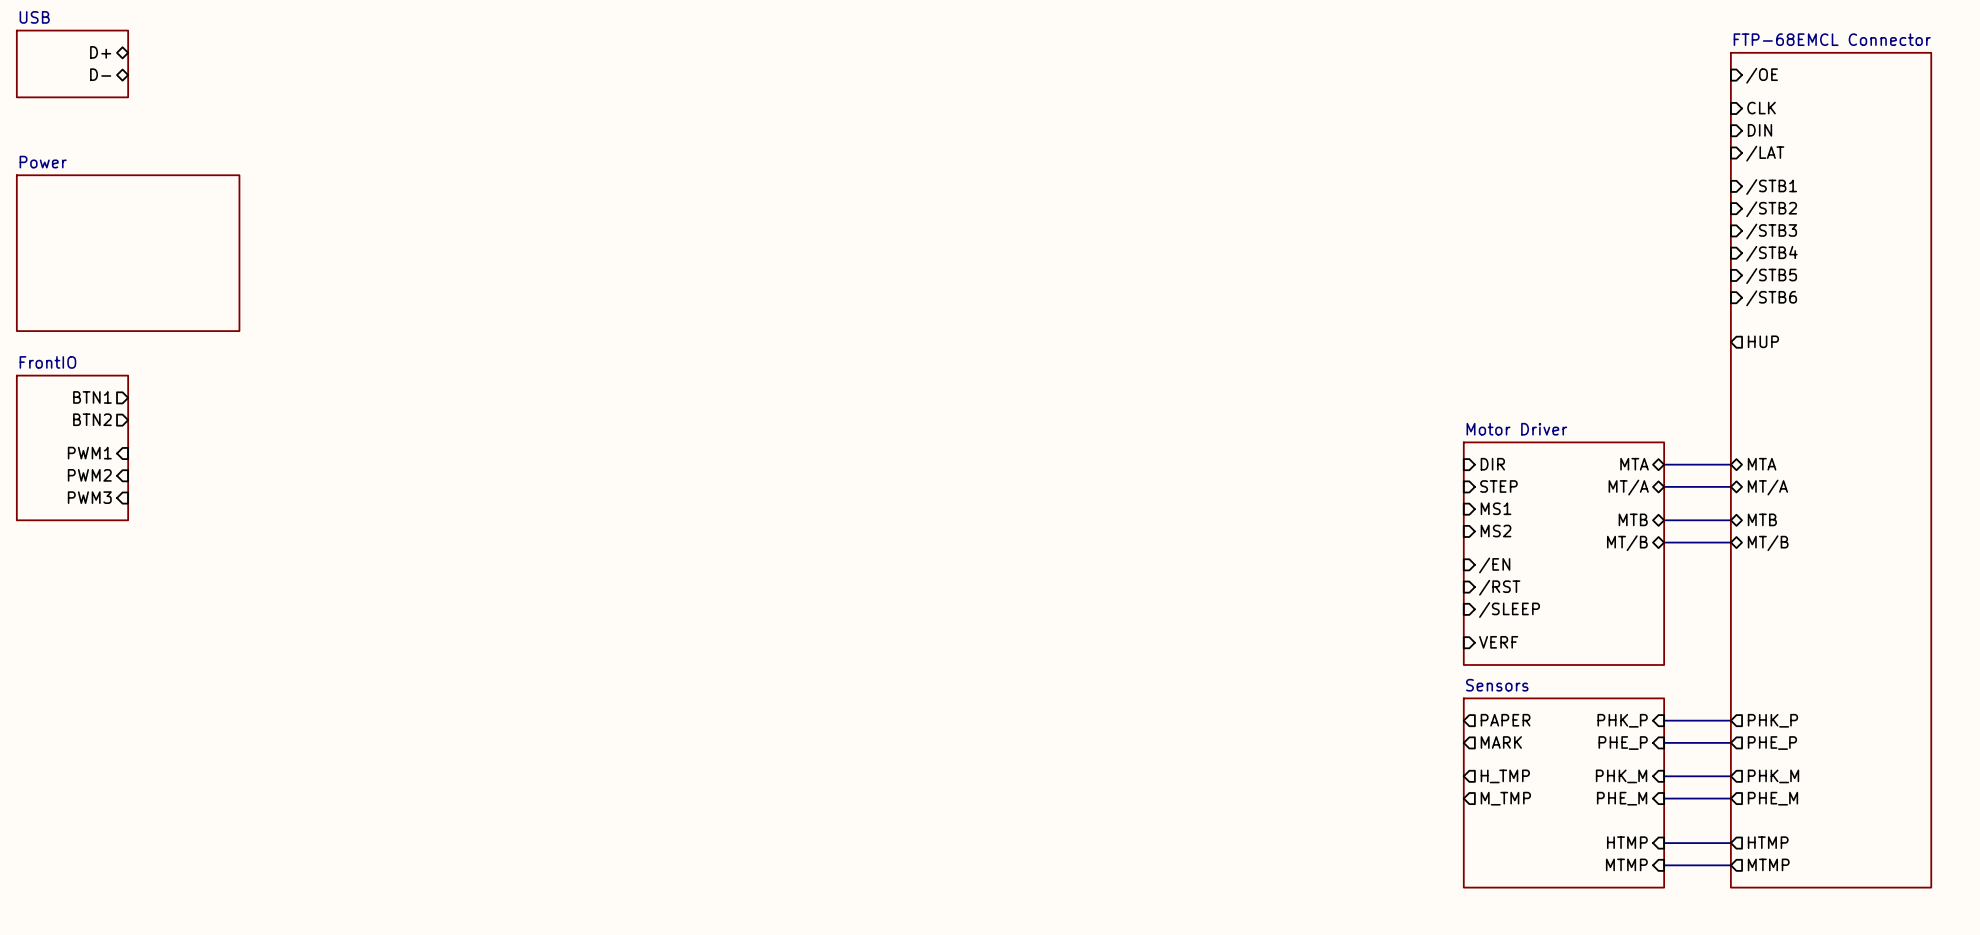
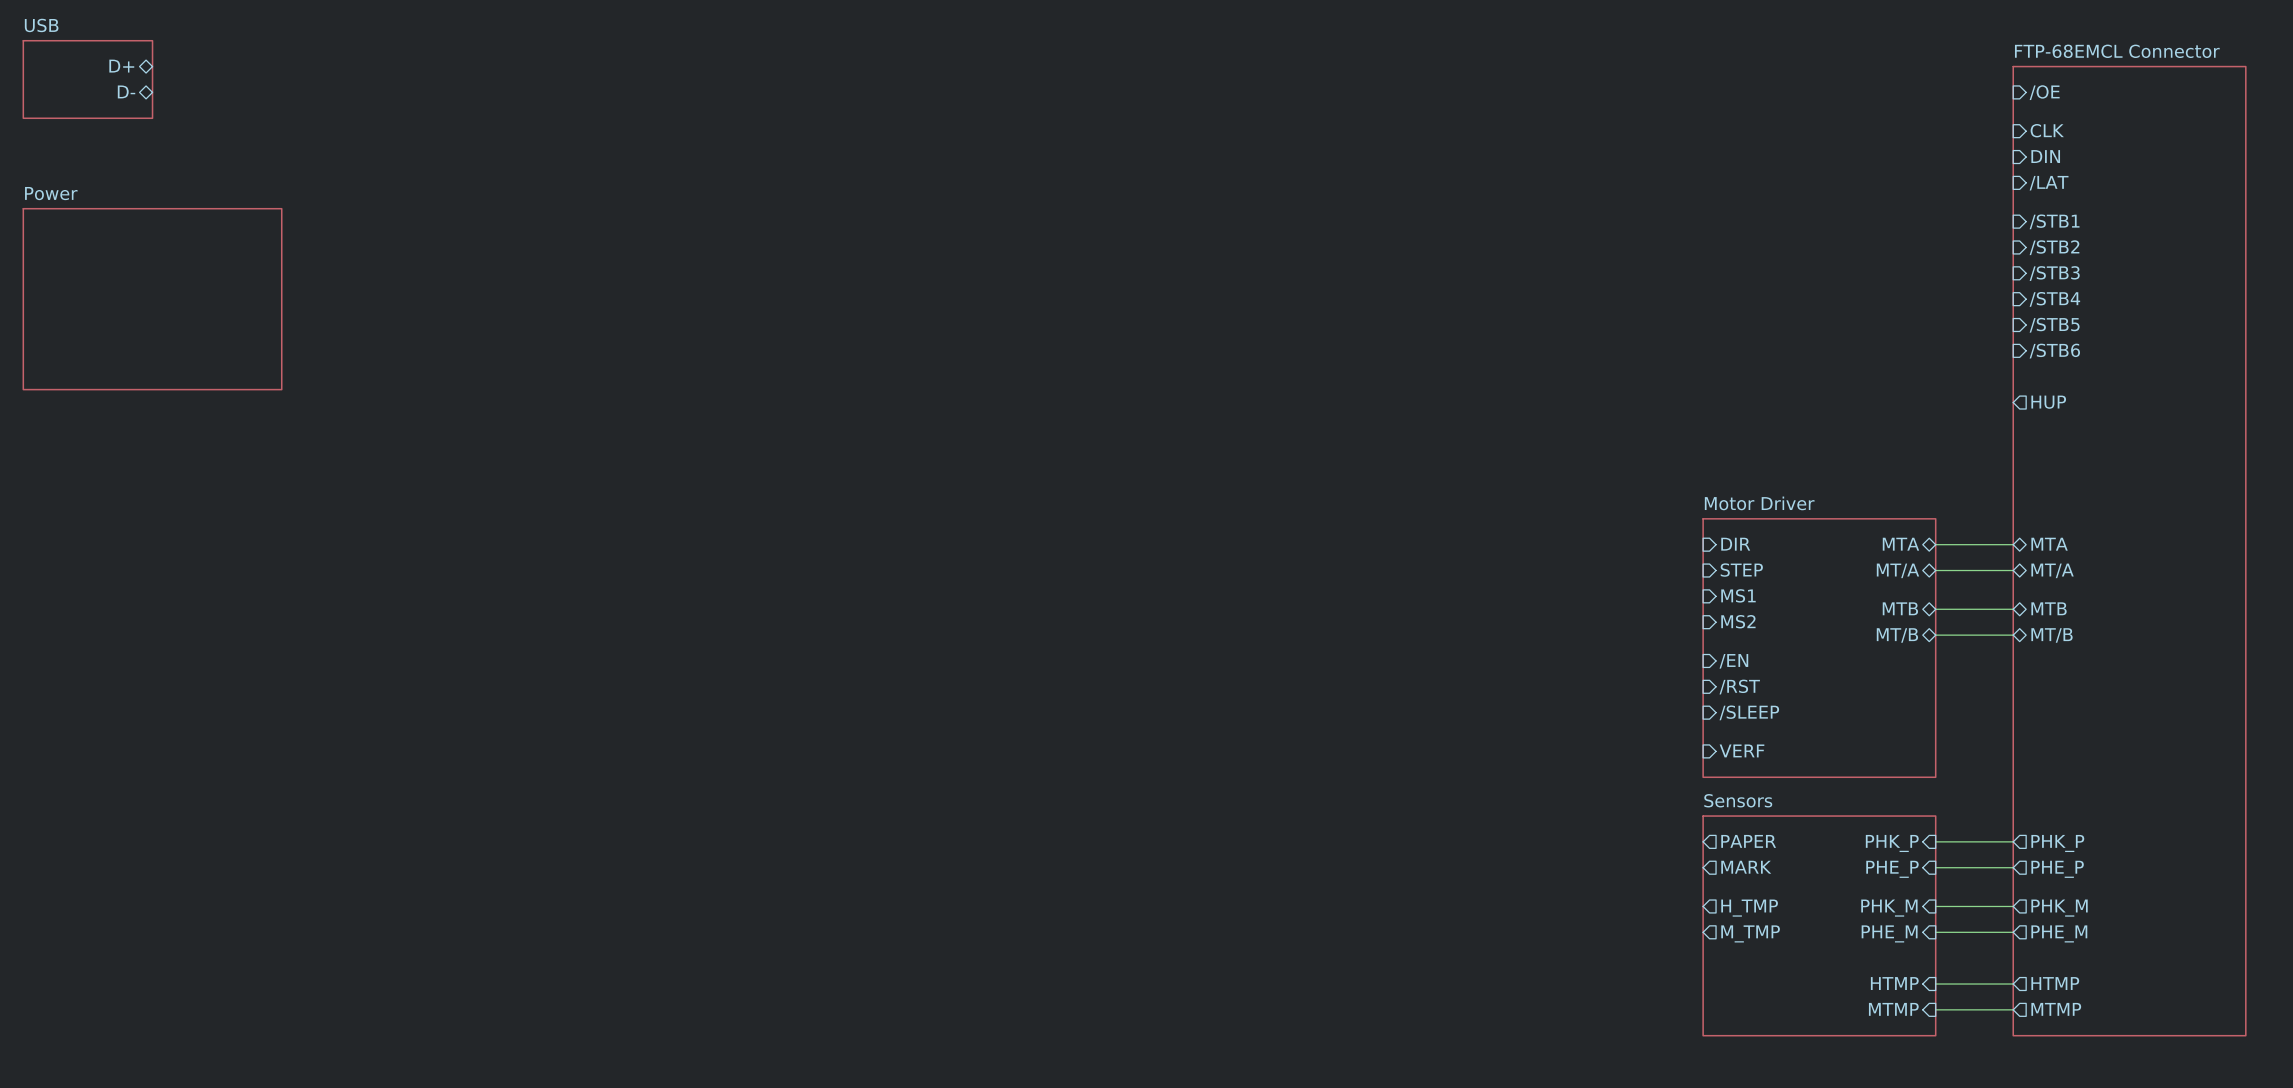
sheet pin: BTN1 (92, 397) -> none
sheet pin: BTN2 (92, 419) -> none
sheet FrontIO: (72, 447) -> none
sheet pin: PWM1 (89, 453) -> none
sheet pin: PWM2 (89, 475) -> none
sheet pin: PWM3 (89, 497) -> none

